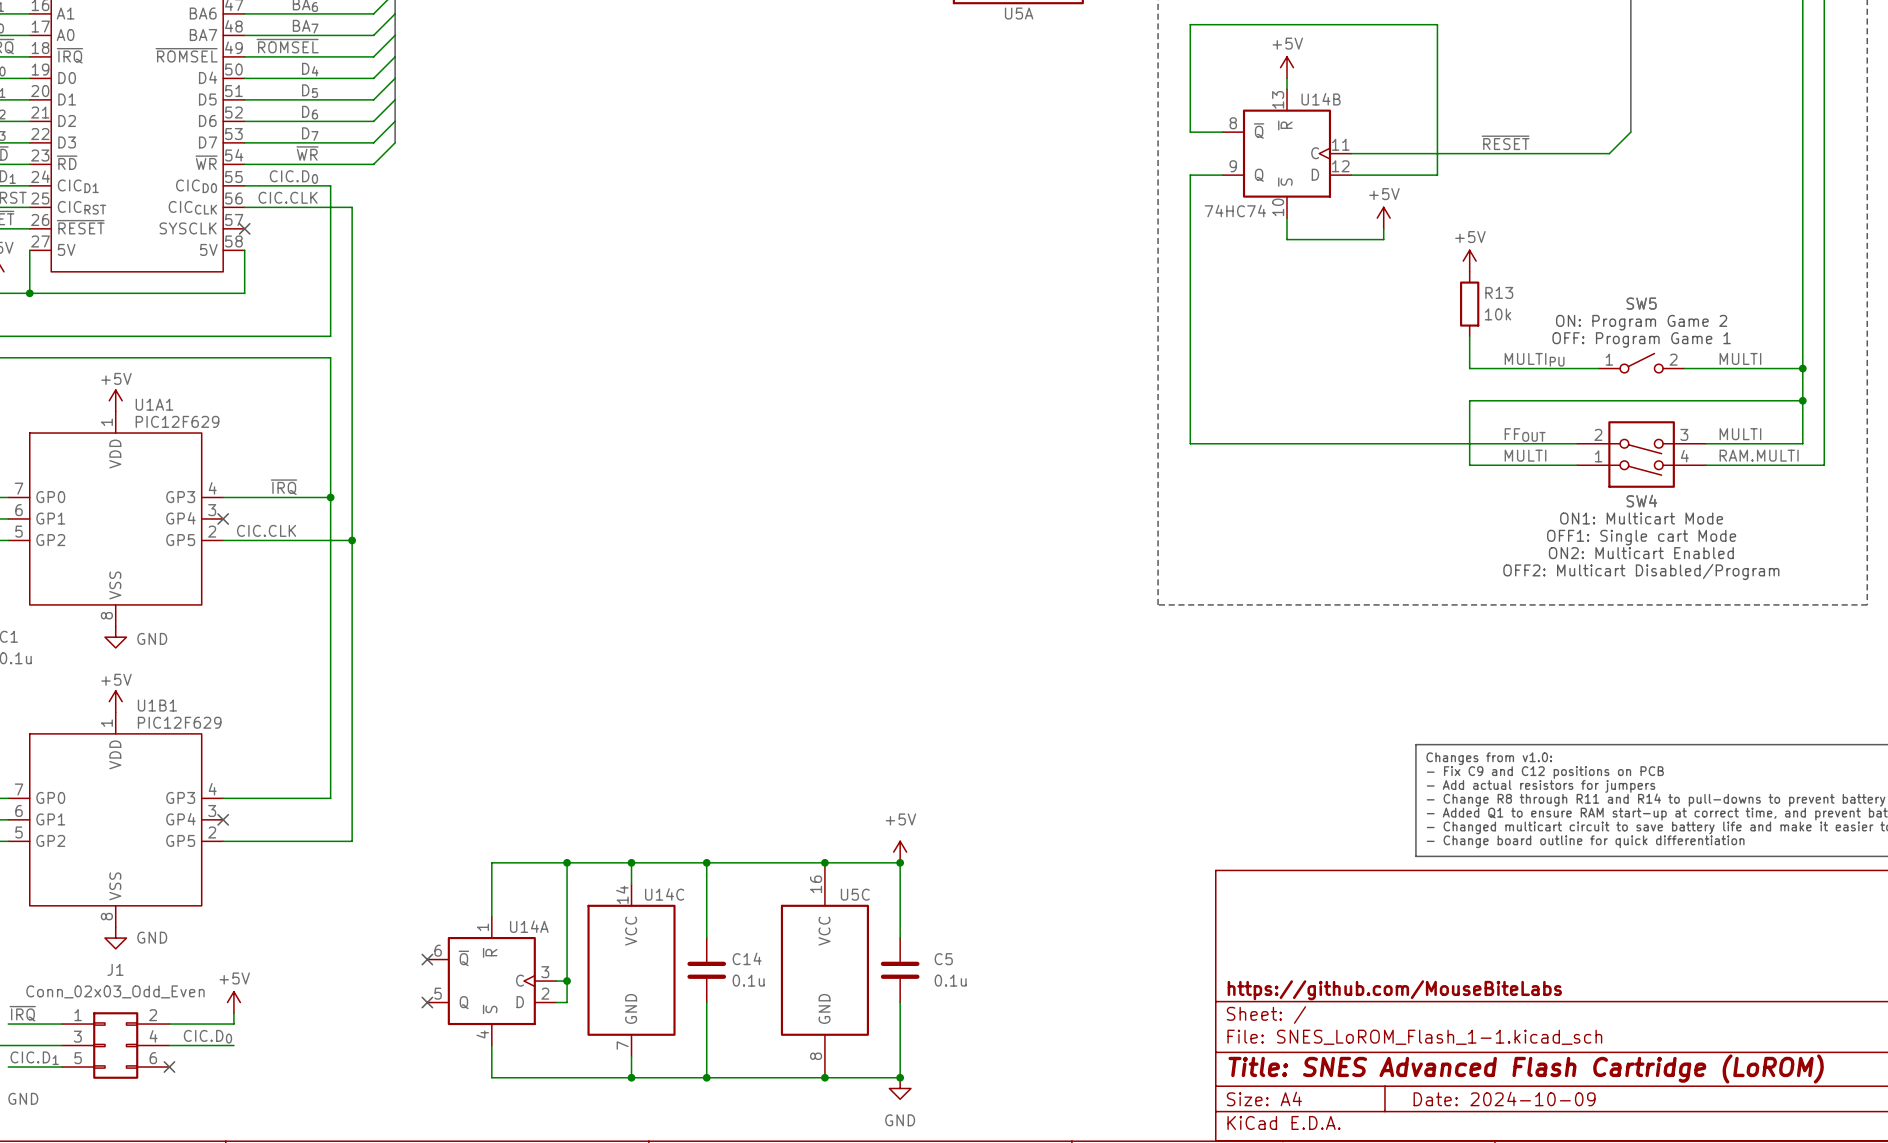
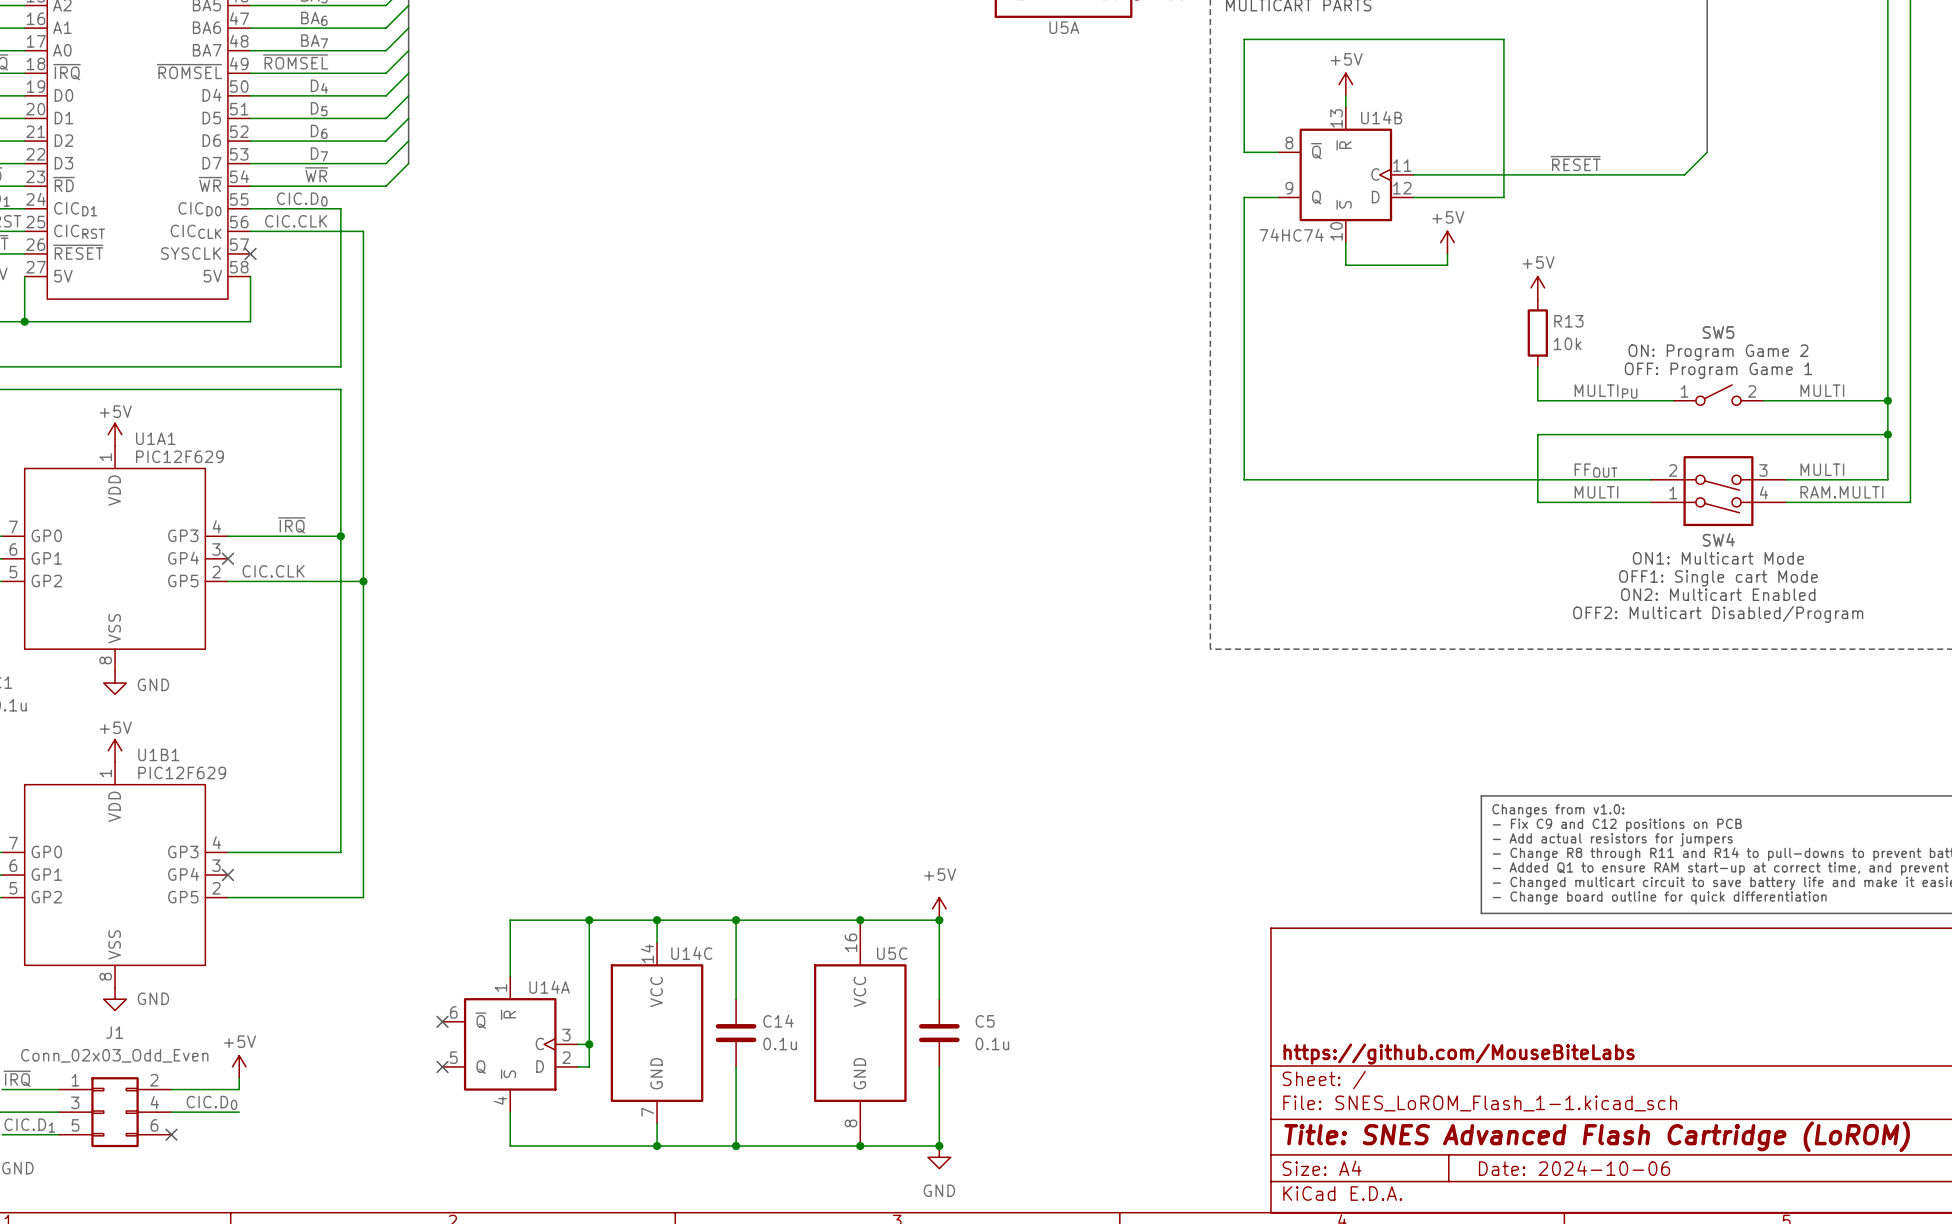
title block: Date: 2024-10-09 (1504, 1098) -> Date: 2024-10-06 (1574, 1168)

